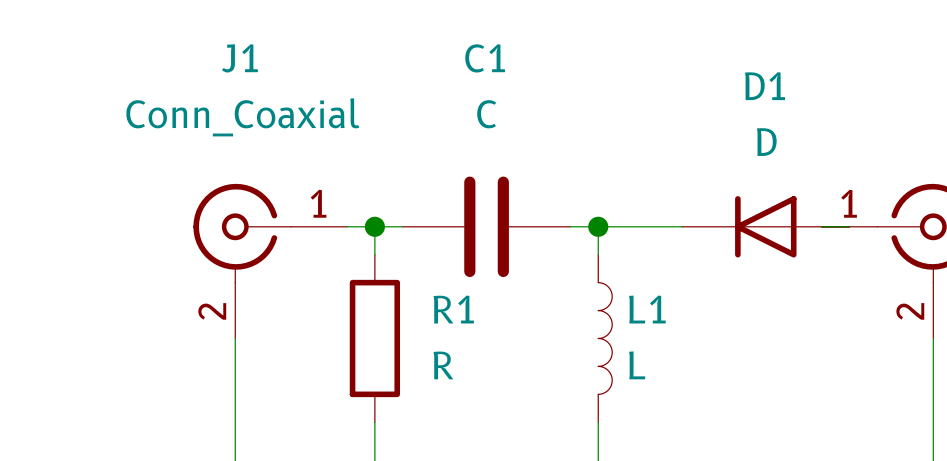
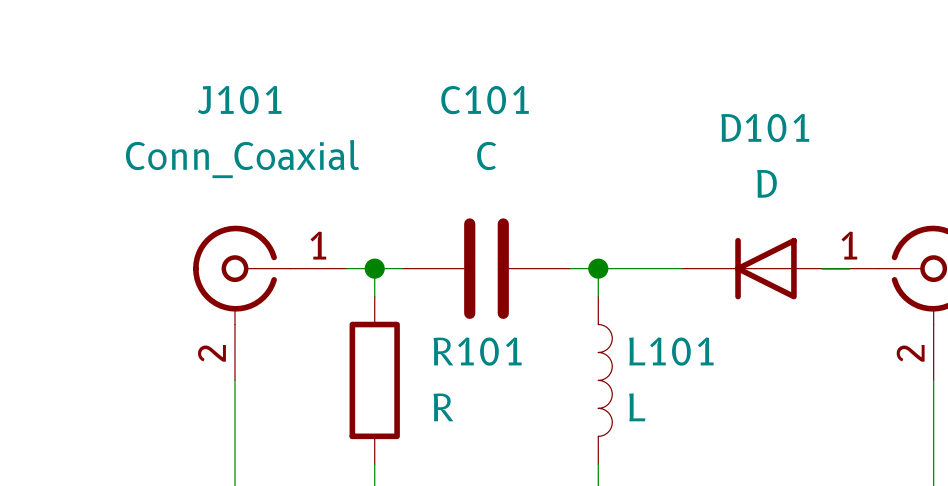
J1 name: J1 (239, 58) -> J101 (239, 100)
C1 name: C1 (485, 58) -> C101 (485, 100)
D1 name: D1 (765, 86) -> D101 (765, 128)
R1 name: R1 (453, 309) -> R101 (477, 351)
L1 name: L1 (647, 309) -> L101 (671, 351)

